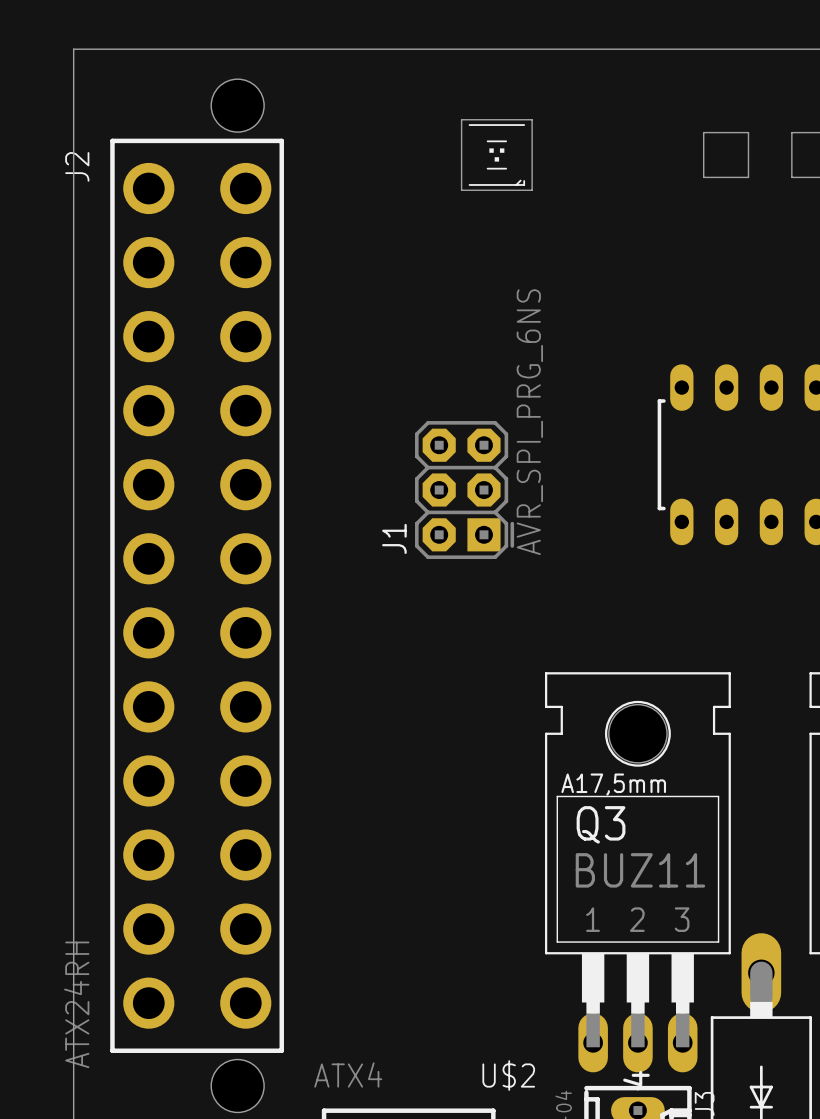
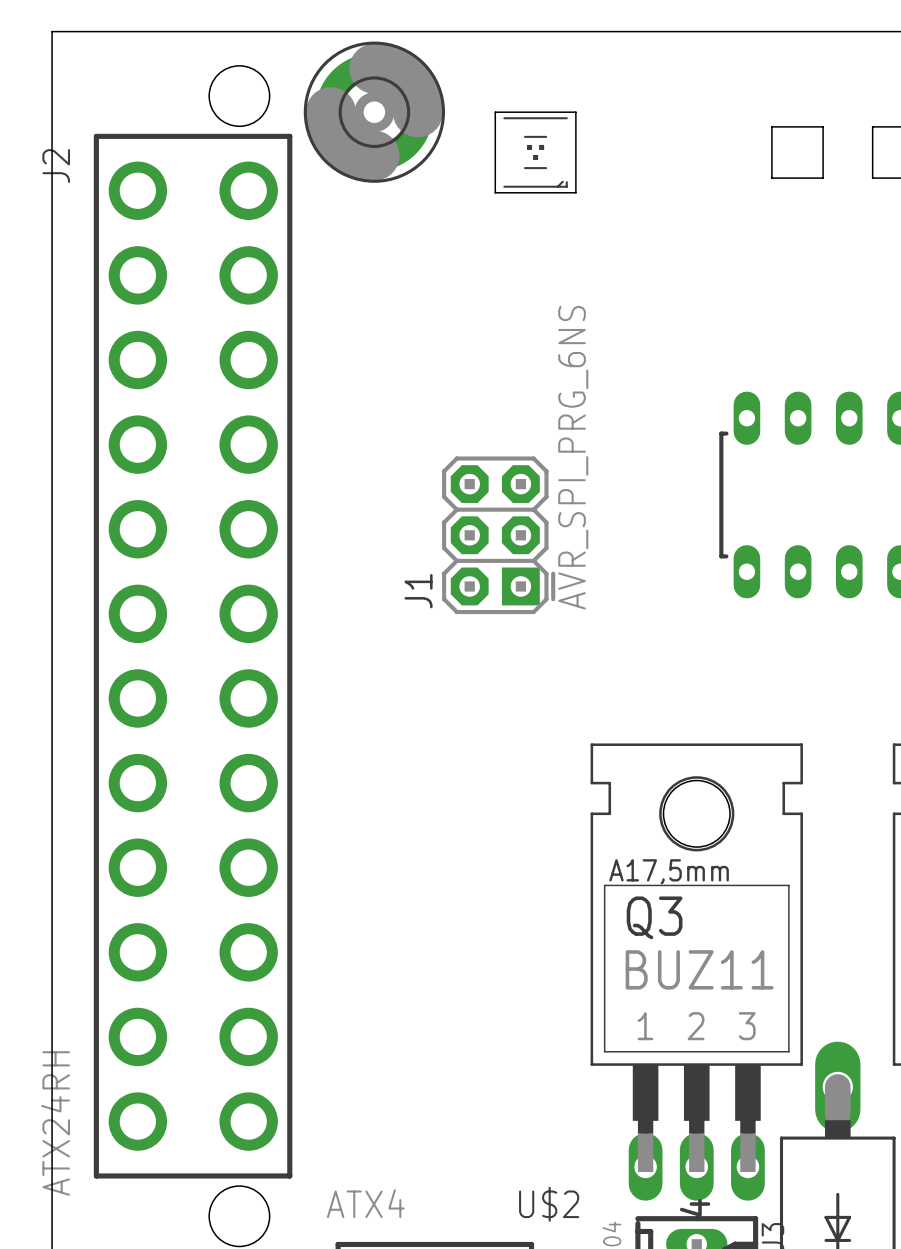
part: none -> (374, 112)

